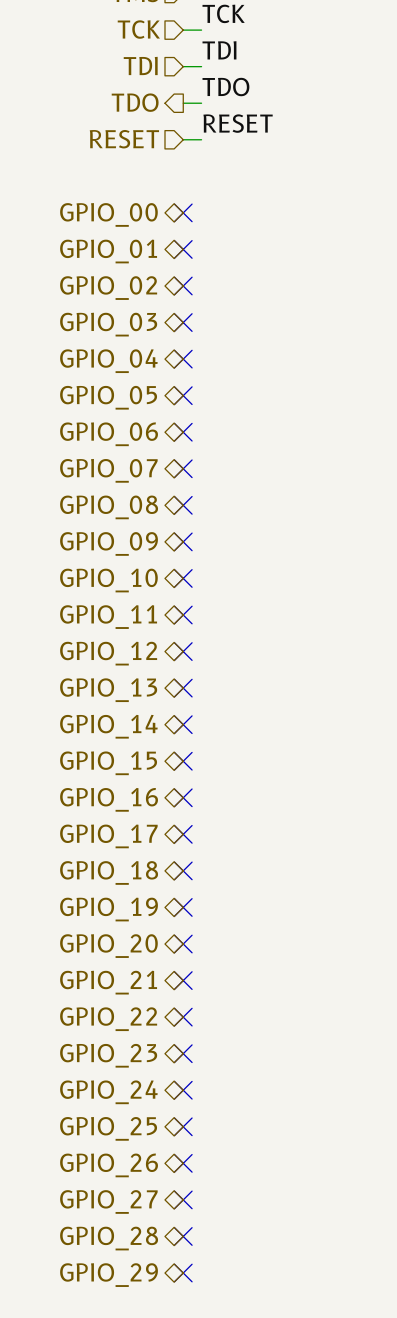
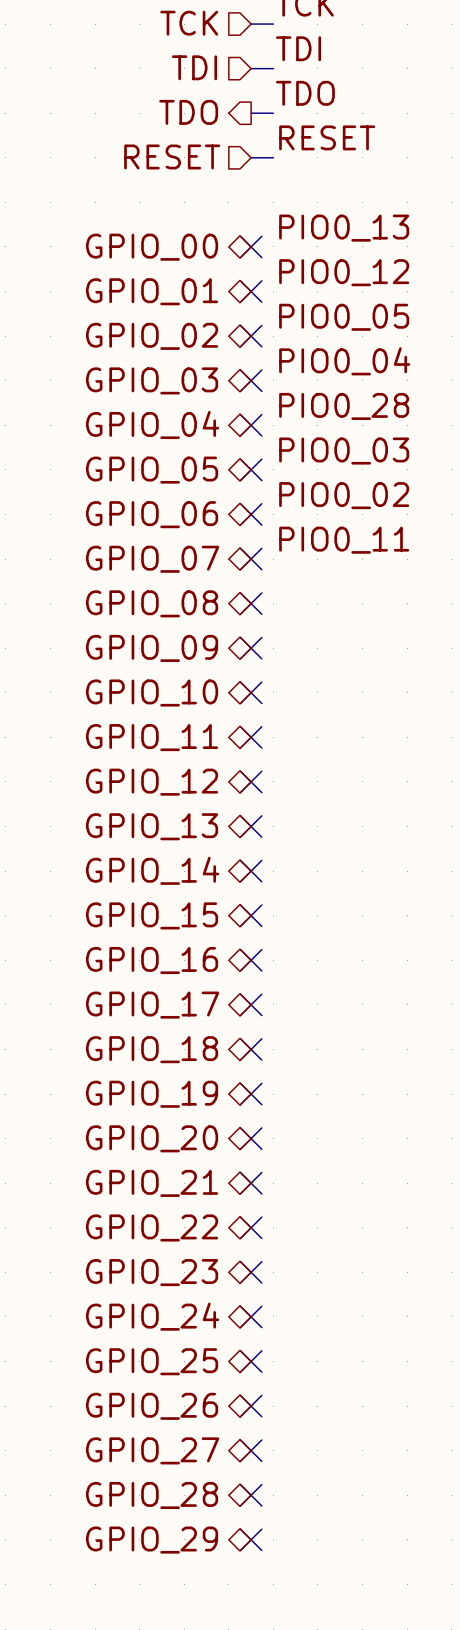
label: none -> PIO0_13 (344, 228)
label: none -> PIO0_12 (344, 272)
label: none -> PIO0_05 (344, 317)
label: none -> PIO0_04 (344, 361)
label: none -> PIO0_28 (344, 406)
label: none -> PIO0_03 (344, 451)
label: none -> PIO0_02 (344, 495)
label: none -> PIO0_11 (344, 540)

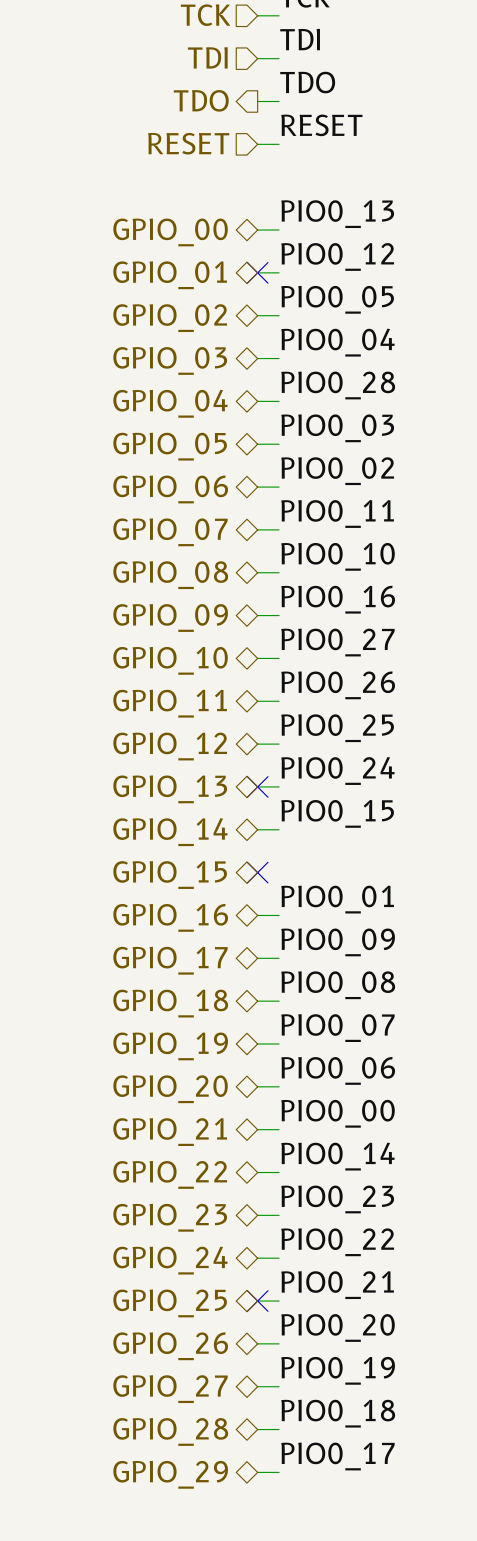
wire: none -> (257, 230) (279, 230)
no-connect mark: (251, 246) -> none
wire: none -> (257, 272) (279, 272)
wire: none -> (257, 315) (279, 315)
no-connect mark: (251, 336) -> none
wire: none -> (257, 358) (279, 358)
no-connect mark: (251, 380) -> none
wire: none -> (257, 401) (279, 401)
no-connect mark: (251, 425) -> none
wire: none -> (257, 444) (279, 444)
no-connect mark: (251, 469) -> none
wire: none -> (257, 487) (279, 487)
no-connect mark: (251, 514) -> none
wire: none -> (257, 529) (279, 529)
no-connect mark: (251, 559) -> none
label: none -> PIO0_10 (338, 556)
wire: none -> (257, 572) (279, 572)
no-connect mark: (251, 603) -> none
label: none -> PIO0_16 (338, 599)
wire: none -> (257, 615) (279, 615)
no-connect mark: (251, 648) -> none
label: none -> PIO0_27 (337, 642)
wire: none -> (257, 658) (279, 658)
no-connect mark: (251, 692) -> none
label: none -> PIO0_26 (338, 685)
wire: none -> (257, 701) (279, 701)
no-connect mark: (251, 737) -> none
label: none -> PIO0_25 (337, 728)
wire: none -> (257, 744) (279, 744)
no-connect mark: (251, 781) -> none
label: none -> PIO0_24 (337, 771)
wire: none -> (257, 786) (279, 786)
label: none -> PIO0_15 (337, 813)
wire: none -> (257, 829) (279, 829)
no-connect mark: (251, 871) -> none
label: none -> PIO0_01 (337, 899)
wire: none -> (257, 915) (279, 915)
no-connect mark: (251, 960) -> none
label: none -> PIO0_09 (338, 942)
wire: none -> (257, 958) (279, 958)
no-connect mark: (251, 1004) -> none
label: none -> PIO0_08 (338, 985)
wire: none -> (257, 1001) (279, 1001)
no-connect mark: (251, 1049) -> none
label: none -> PIO0_07 (337, 1028)
wire: none -> (257, 1043) (279, 1043)
no-connect mark: (251, 1094) -> none
label: none -> PIO0_06 (338, 1070)
wire: none -> (257, 1086) (279, 1086)
no-connect mark: (251, 1138) -> none
label: none -> PIO0_00 (338, 1113)
wire: none -> (257, 1129) (279, 1129)
no-connect mark: (251, 1183) -> none
label: none -> PIO0_14 (337, 1156)
wire: none -> (257, 1172) (279, 1172)
no-connect mark: (251, 1227) -> none
label: none -> PIO0_23 (337, 1199)
wire: none -> (257, 1215) (279, 1215)
no-connect mark: (251, 1272) -> none
label: none -> PIO0_22 (337, 1242)
wire: none -> (257, 1258) (279, 1258)
no-connect mark: (251, 1316) -> none
label: none -> PIO0_21 (337, 1285)
wire: none -> (257, 1301) (279, 1301)
label: none -> PIO0_20 (338, 1327)
wire: none -> (257, 1343) (279, 1343)
no-connect mark: (251, 1406) -> none
label: none -> PIO0_19 (338, 1370)
wire: none -> (257, 1386) (279, 1386)
no-connect mark: (251, 1450) -> none
label: none -> PIO0_18 (338, 1413)
wire: none -> (257, 1429) (279, 1429)
no-connect mark: (251, 1495) -> none
label: none -> PIO0_17 (337, 1456)
wire: none -> (257, 1472) (279, 1472)
no-connect mark: (251, 1539) -> none

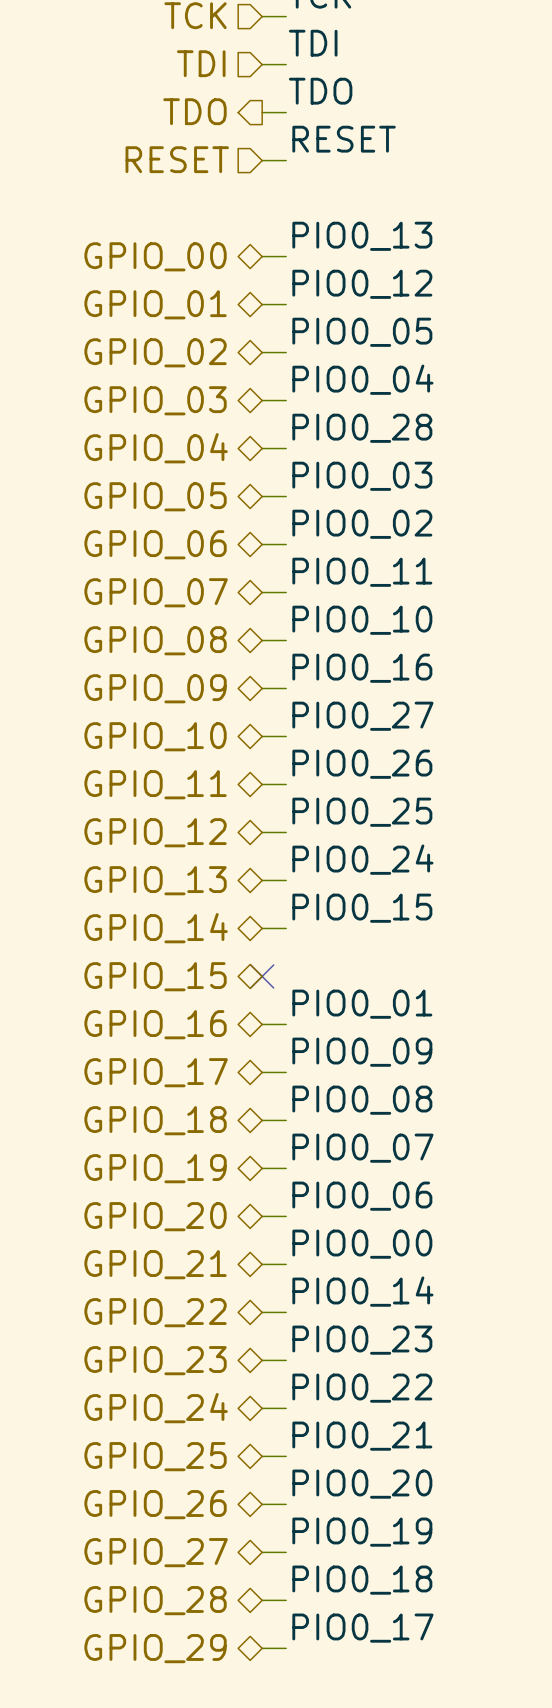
no-connect mark: (257, 272) -> none
no-connect mark: (257, 786) -> none
no-connect mark: (257, 1301) -> none

